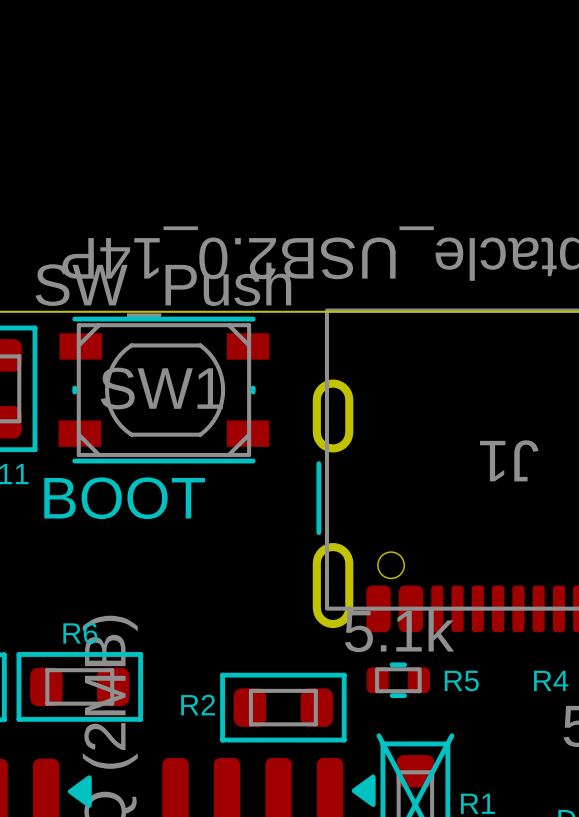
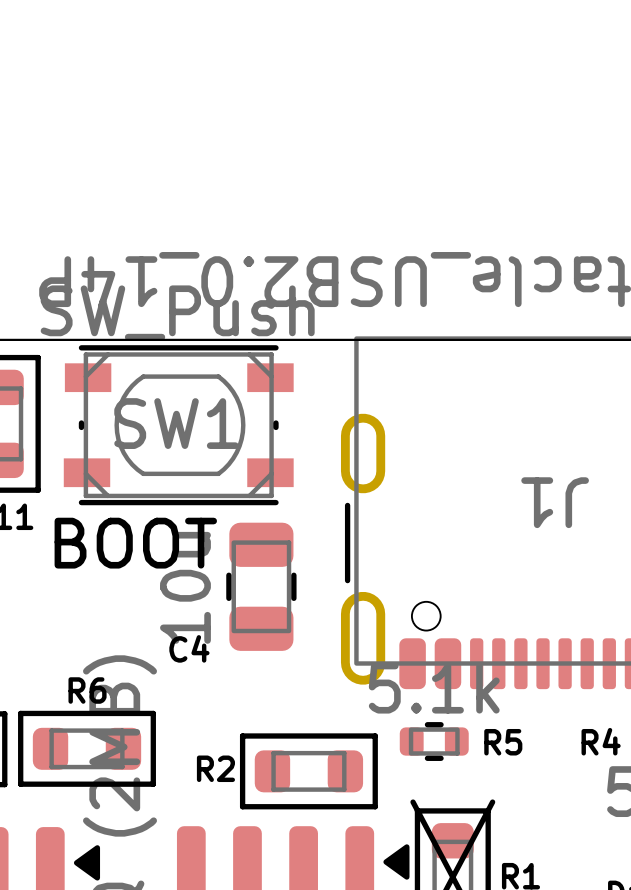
C4: none -> 10u (261, 586)

